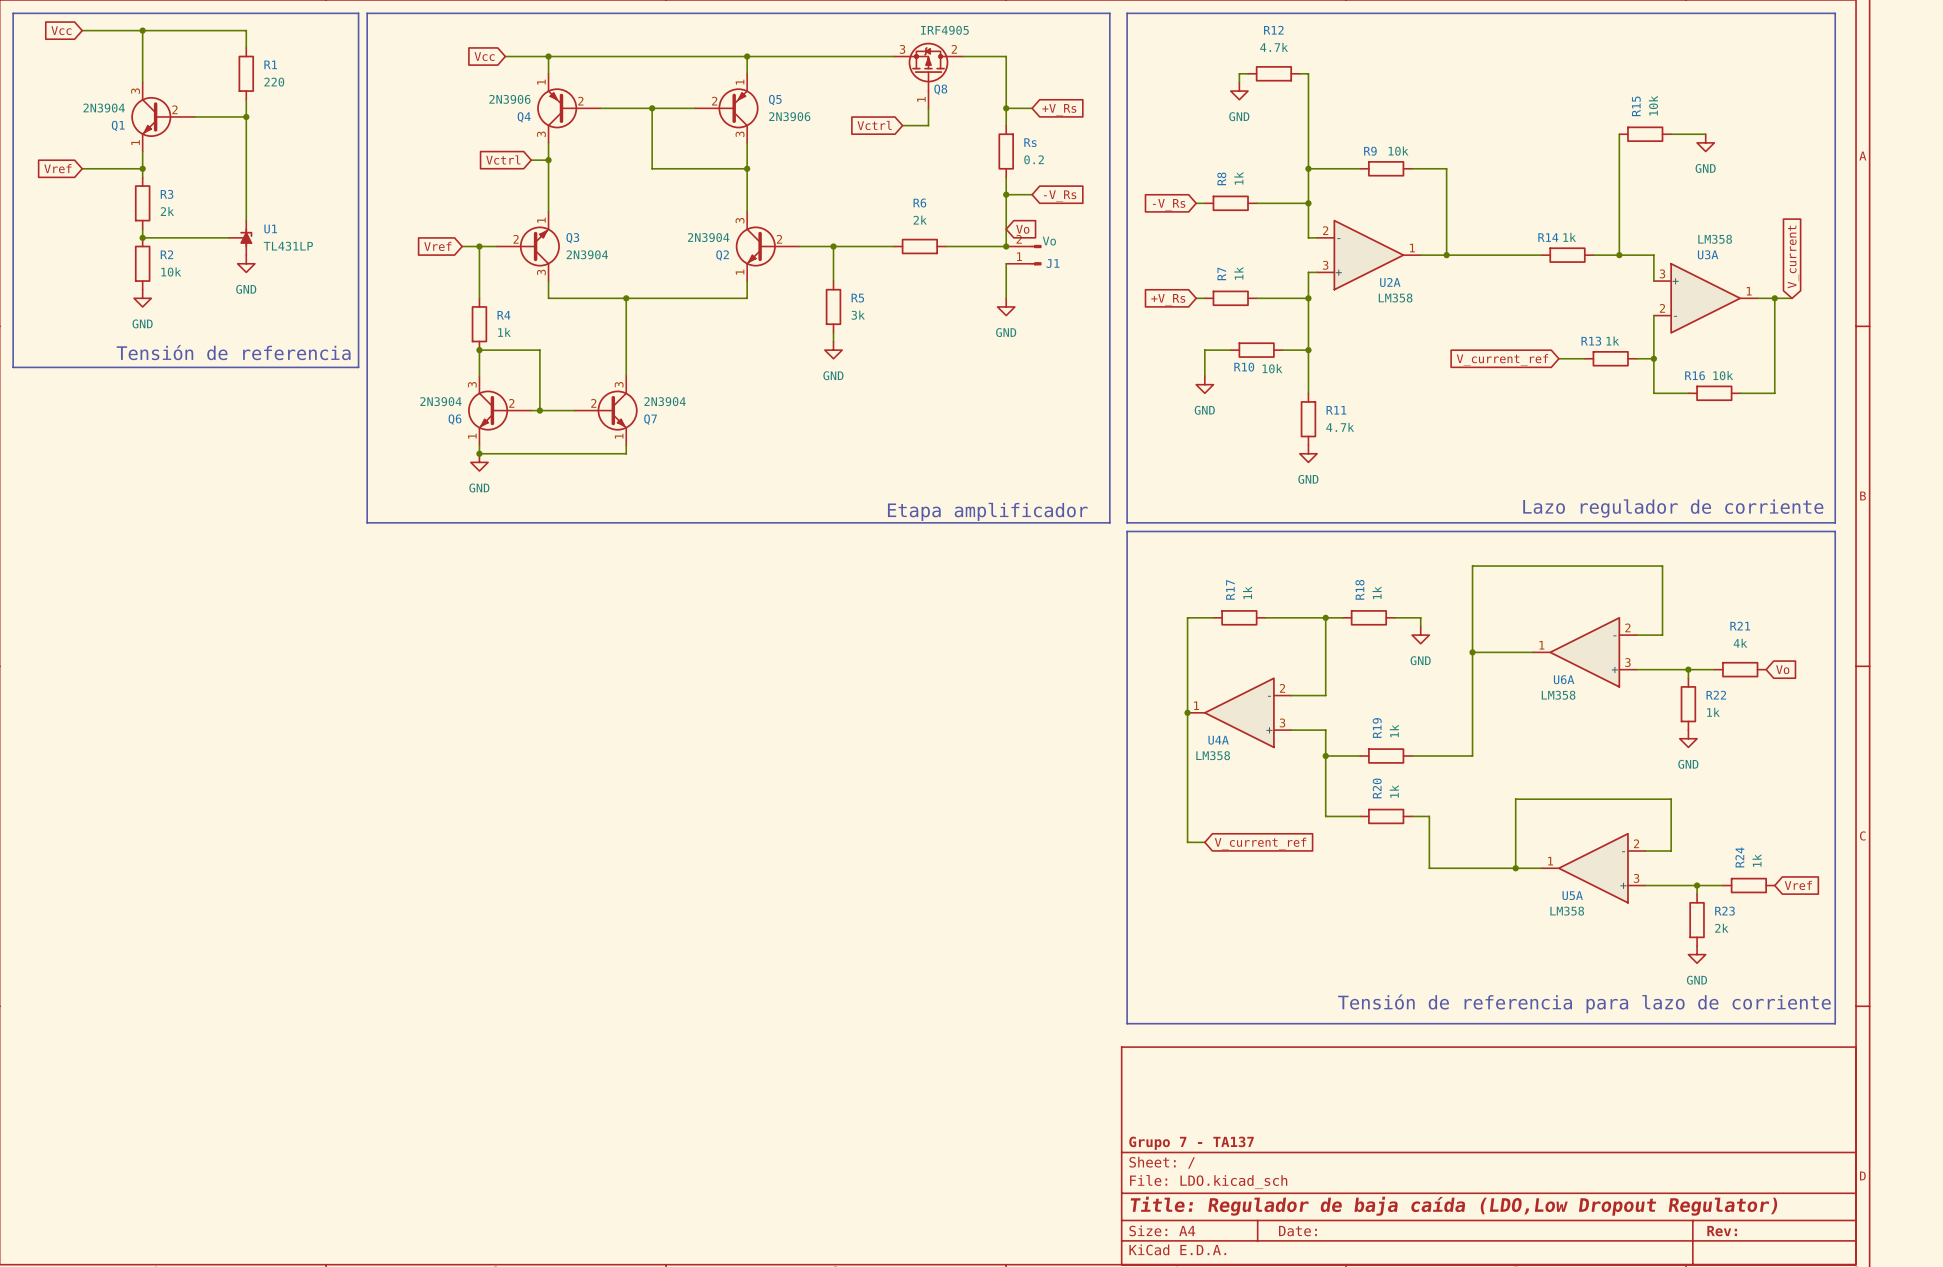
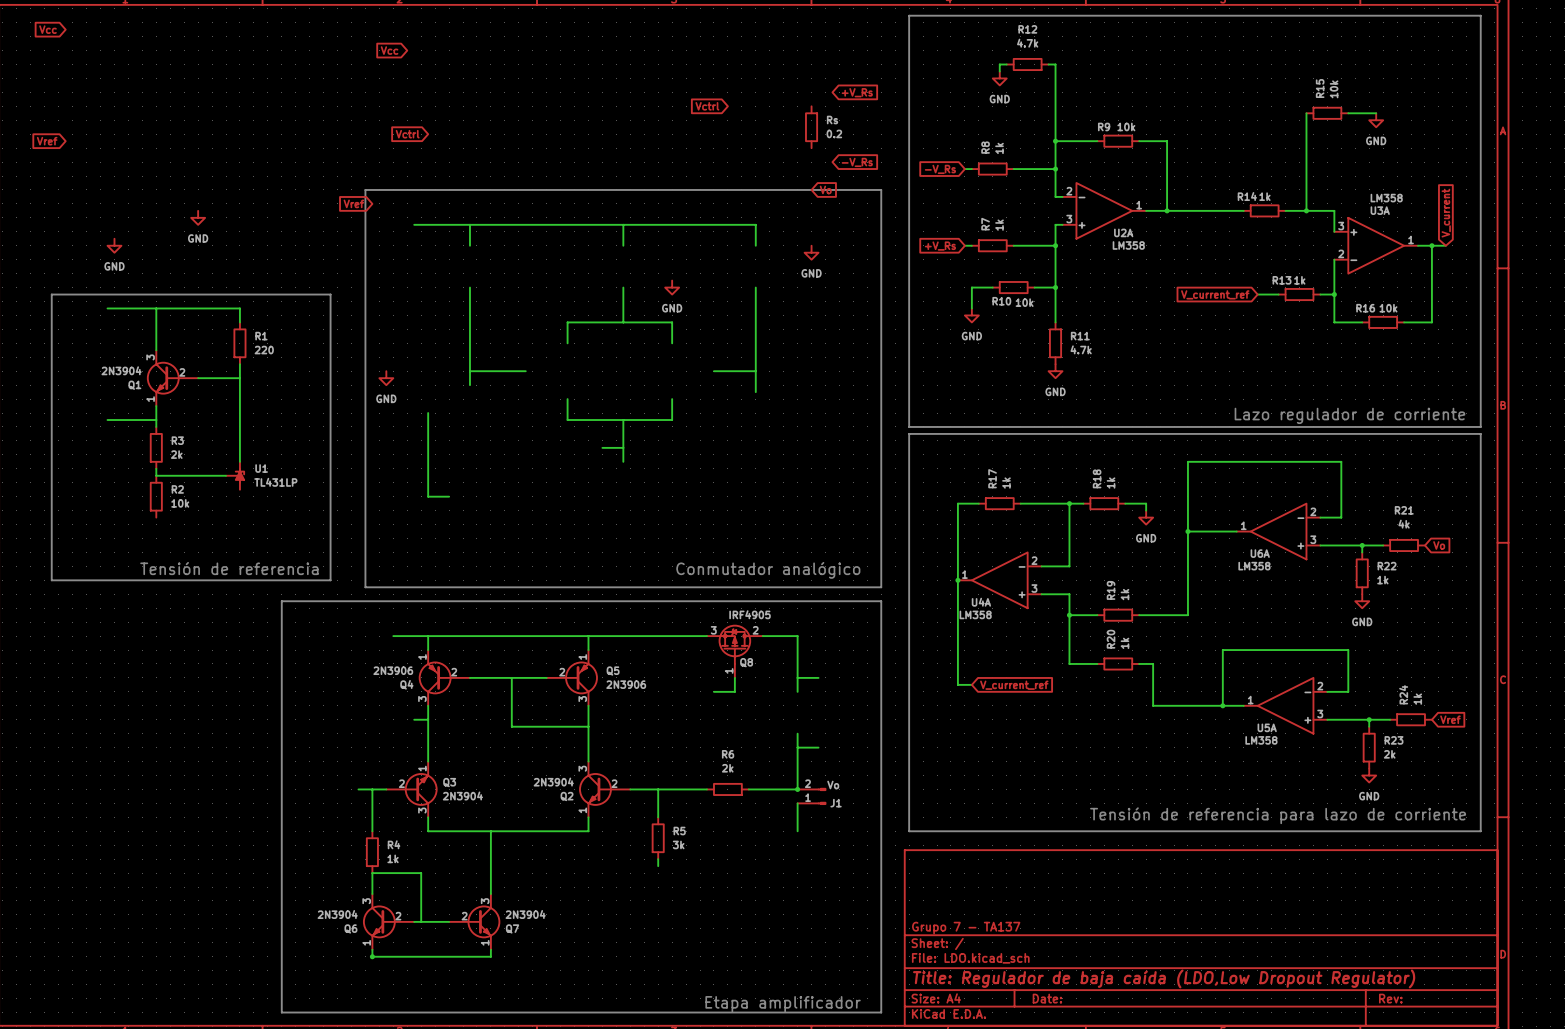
line: (13, 13) (358, 13) (358, 367) (13, 367) (13, 13) -> none
line: (367, 13) (1109, 13) (1109, 522) (367, 522) (367, 13) -> none
wire: (82, 30) (246, 30) (246, 47) -> none
wire: (142, 30) (142, 82) -> none
junction: (142, 30) -> none
wire: (505, 56) (893, 56) -> none
wire: (548, 56) (548, 73) -> none
junction: (548, 56) -> none
wire: (747, 56) (747, 73) -> none
junction: (747, 56) -> none
wire: (963, 56) (1006, 56) (1006, 125) -> none
R1 position: (246, 73) -> (239, 343)
Q8 position: (928, 75) -> (734, 651)
wire: (246, 99) (246, 220) -> none
Q4 position: (568, 108) -> (444, 677)
wire: (600, 108) (695, 108) -> none
wire: (652, 108) (652, 168) (747, 168) -> none
junction: (652, 108) -> none
Q5 position: (726, 108) -> (572, 677)
wire: (928, 108) (928, 125) (902, 125) -> none
wire: (1006, 108) (1032, 108) -> none
junction: (1006, 108) -> none
Q1 position: (162, 116) -> (172, 378)
wire: (194, 116) (246, 116) -> none
junction: (246, 116) -> none
wire: (548, 142) (548, 211) -> none
wire: (747, 142) (747, 211) -> none
wire: (142, 151) (142, 177) -> none
wire: (531, 160) (548, 160) -> none
junction: (548, 160) -> none
wire: (82, 168) (142, 168) -> none
junction: (142, 168) -> none
junction: (747, 168) -> none
wire: (1006, 177) (1006, 246) (945, 246) -> none
wire: (1006, 194) (1032, 194) -> none
junction: (1006, 194) -> none
R3 position: (142, 203) -> (156, 447)
wire: (142, 229) (142, 237) (229, 237) -> none
line: none -> (365, 189) (881, 189) (881, 587) (365, 587) (365, 189)
junction: (142, 237) -> none
U1 position: (240, 237) -> (235, 475)
wire: (462, 246) (496, 246) -> none
wire: (479, 246) (479, 298) -> none
junction: (479, 246) -> none
Q3 position: (528, 246) -> (411, 789)
Q2 position: (767, 246) -> (604, 789)
wire: (798, 246) (893, 246) -> none
wire: (833, 246) (833, 281) -> none
junction: (833, 246) -> none
R6 position: (919, 246) -> (727, 789)
junction: (1006, 246) -> none
J1 position: (1023, 255) -> (811, 796)
R2 position: (142, 263) -> (156, 496)
wire: (1006, 263) (1006, 298) -> none
wire: none -> (414, 224) (755, 224) (755, 245)
wire: none -> (469, 224) (469, 245)
wire: none -> (623, 224) (623, 245)
wire: (548, 281) (548, 298) (747, 298) (747, 281) -> none
wire: (626, 298) (626, 376) -> none
junction: (626, 298) -> none
R5 position: (833, 306) -> (658, 838)
R4 position: (479, 324) -> (372, 852)
wire: (833, 332) (833, 341) -> none
junction: (479, 350) -> none
wire: none -> (469, 287) (469, 385)
wire: none -> (623, 287) (623, 322)
wire: none -> (755, 287) (755, 392)
text: Tensión de referencia (233, 352) -> none
line: none -> (51, 294) (330, 294) (330, 580) (51, 580) (51, 294)
wire: none -> (107, 308) (239, 308) (239, 322)
wire: none -> (156, 308) (156, 350)
wire: (479, 376) (479, 350) (539, 350) (539, 410) -> none
Q6 position: (499, 410) -> (388, 921)
wire: (531, 410) (574, 410) -> none
junction: (539, 410) -> none
Q7 position: (606, 410) -> (474, 921)
wire: none -> (567, 343) (567, 322) (672, 322) (672, 343)
wire: none -> (239, 364) (239, 461)
wire: (479, 445) (479, 453) (583, 453) -> none
wire: (626, 445) (626, 453) -> (525, 371) (504, 371)
junction: (479, 453) -> none
wire: none -> (713, 371) (755, 371)
wire: none -> (198, 378) (239, 378)
wire: none -> (567, 399) (567, 420) (672, 420) (672, 399)
wire: none -> (156, 406) (156, 426)
wire: none -> (428, 413) (428, 496) (449, 496)
text: Etapa amplificador (987, 511) -> none
wire: none -> (107, 420) (156, 420)
wire: none -> (623, 420) (623, 461)
wire: none -> (602, 447) (623, 447)
wire: none -> (156, 468) (156, 475) (226, 475)
text: none -> Tensión de referencia (229, 568)
text: none -> Conmutador analógico (768, 570)
line: none -> (281, 601) (881, 601) (881, 1012) (281, 1012) (281, 601)
wire: none -> (393, 636) (706, 636)
wire: none -> (428, 636) (428, 650)
wire: none -> (588, 636) (588, 650)
wire: none -> (762, 636) (797, 636) (797, 691)
wire: none -> (469, 677) (546, 677)
wire: none -> (511, 677) (511, 726) (588, 726)
wire: none -> (734, 677) (734, 691) (713, 691)
wire: none -> (797, 677) (818, 677)
wire: none -> (428, 705) (428, 761)
wire: none -> (588, 705) (588, 761)
wire: none -> (414, 719) (428, 719)
wire: none -> (797, 733) (797, 789) (748, 789)
wire: none -> (797, 747) (818, 747)
wire: none -> (358, 789) (386, 789)
wire: none -> (372, 789) (372, 831)
wire: none -> (630, 789) (706, 789)
wire: none -> (658, 789) (658, 817)
junction: none -> (797, 789)
wire: none -> (797, 803) (797, 831)
wire: none -> (428, 817) (428, 831) (588, 831) (588, 817)
wire: none -> (490, 831) (490, 894)
wire: none -> (658, 859) (658, 866)
wire: none -> (372, 894) (372, 873) (421, 873) (421, 921)
wire: none -> (414, 921) (449, 921)
wire: none -> (372, 949) (372, 956) (490, 956) (490, 949)
junction: none -> (372, 956)
text: none -> Etapa amplificador (783, 1004)

